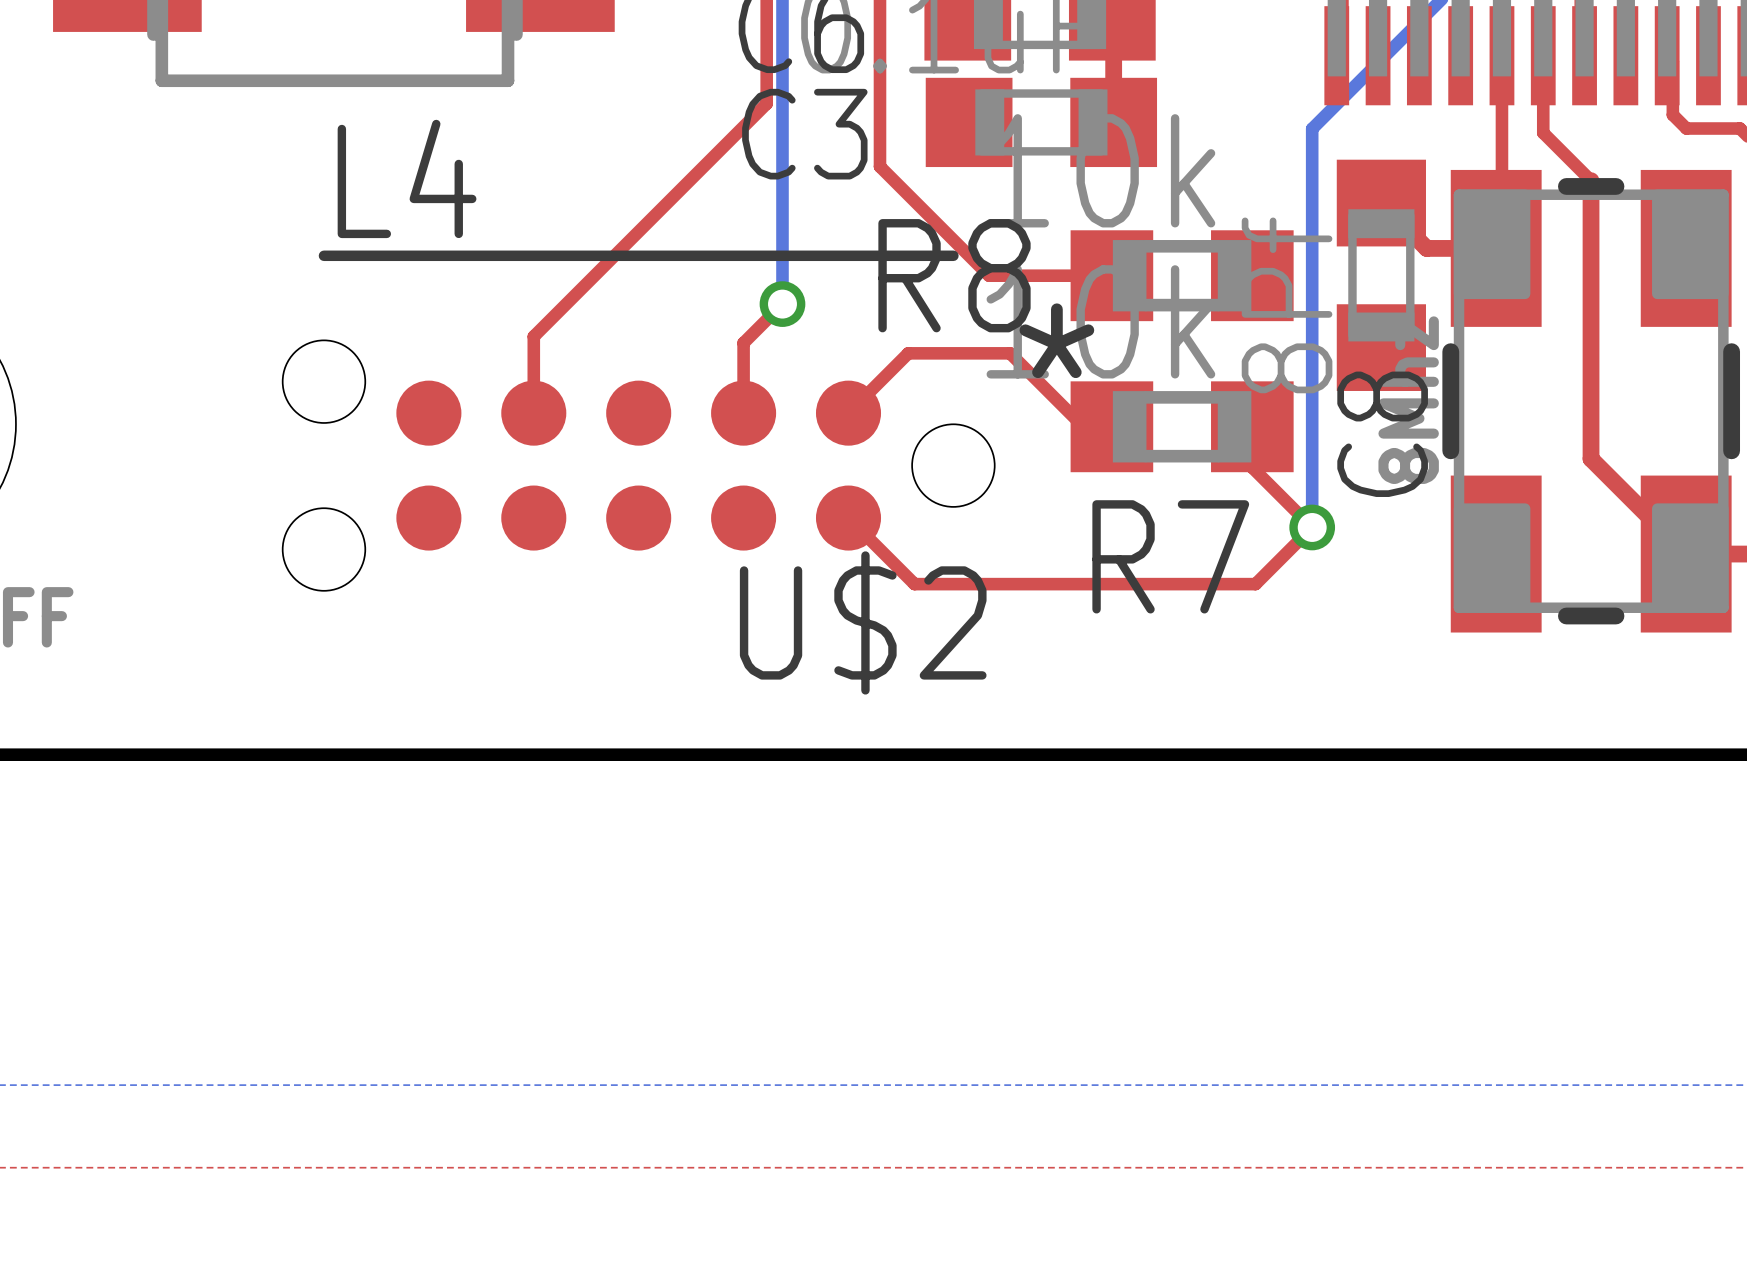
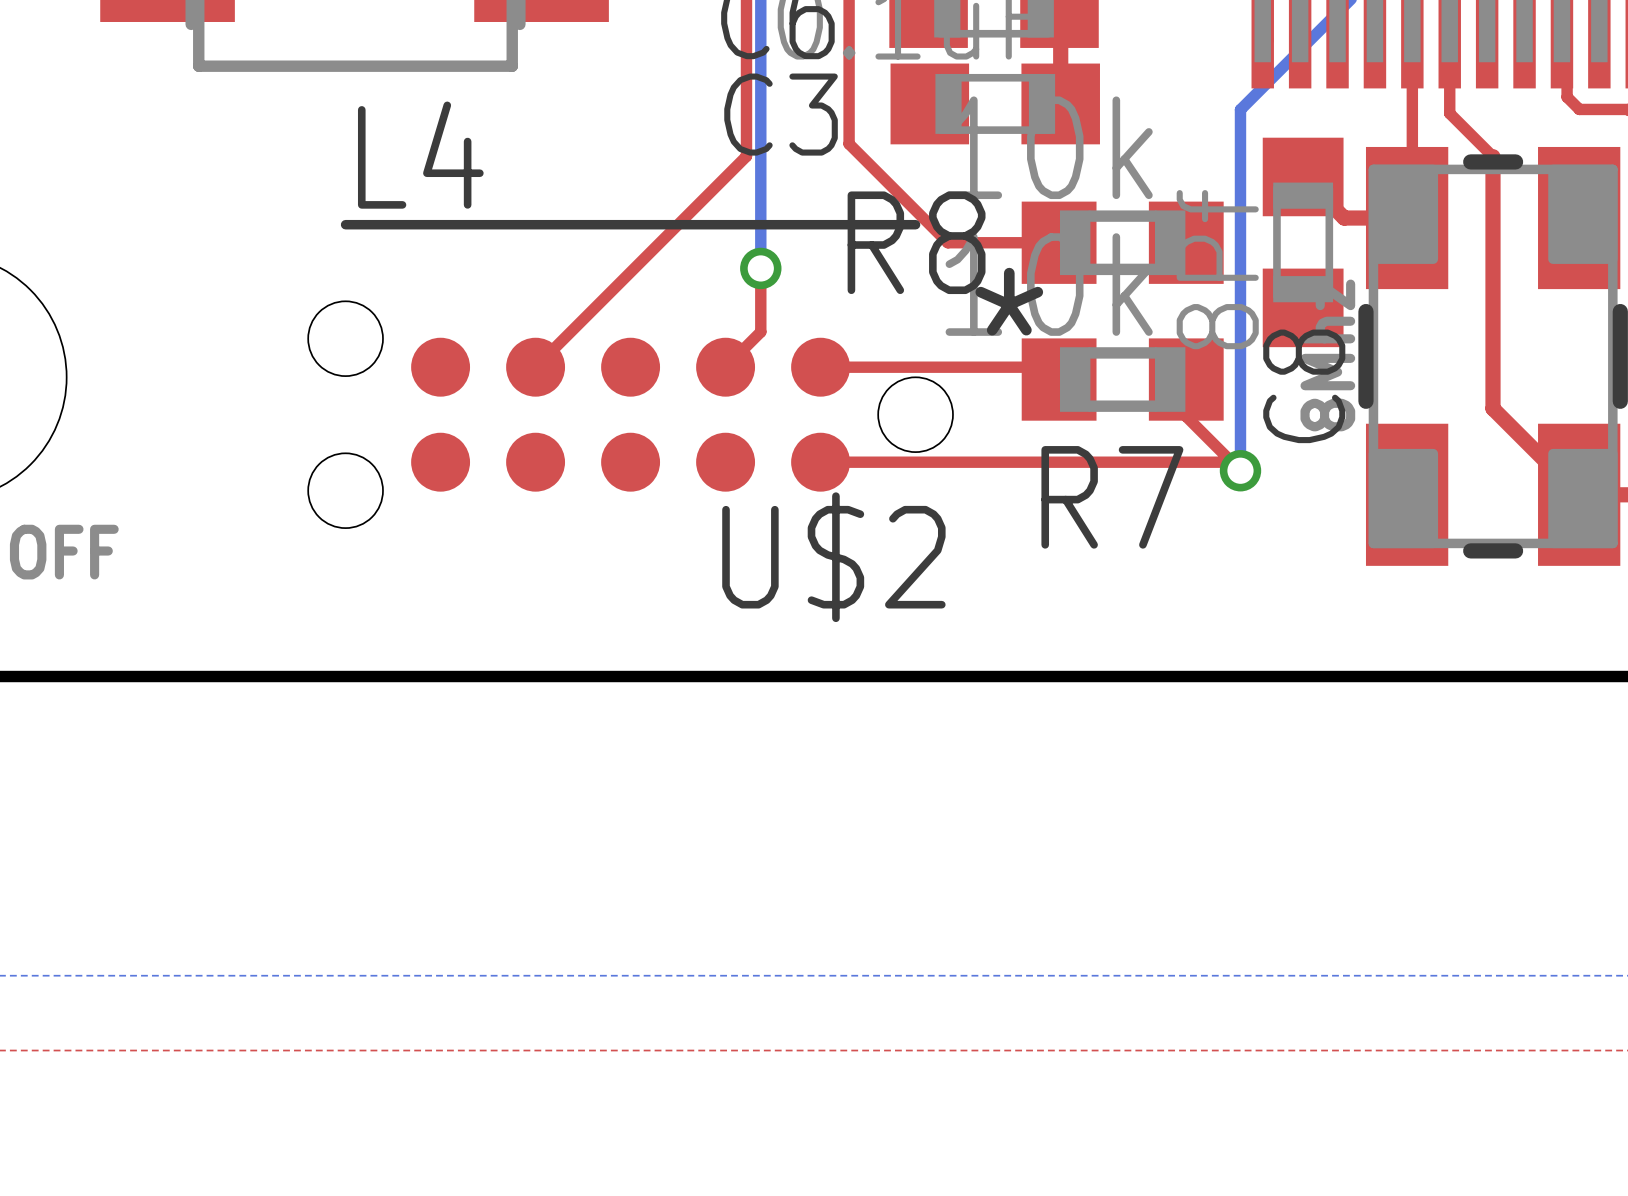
top track: (766, 103) (533, 336) (533, 413) -> (746, 86) (746, 156) (535, 367)
top track: (782, 304) (743, 342) (743, 413) -> (760, 268) (760, 331) (725, 367)
top track: (848, 413) (908, 353) (1010, 353) (1083, 426) (1111, 426) -> (820, 367) (1046, 367) (1059, 379)
top track: (848, 518) (914, 584) (1255, 584) (1312, 527) -> (820, 462) (1231, 462)

